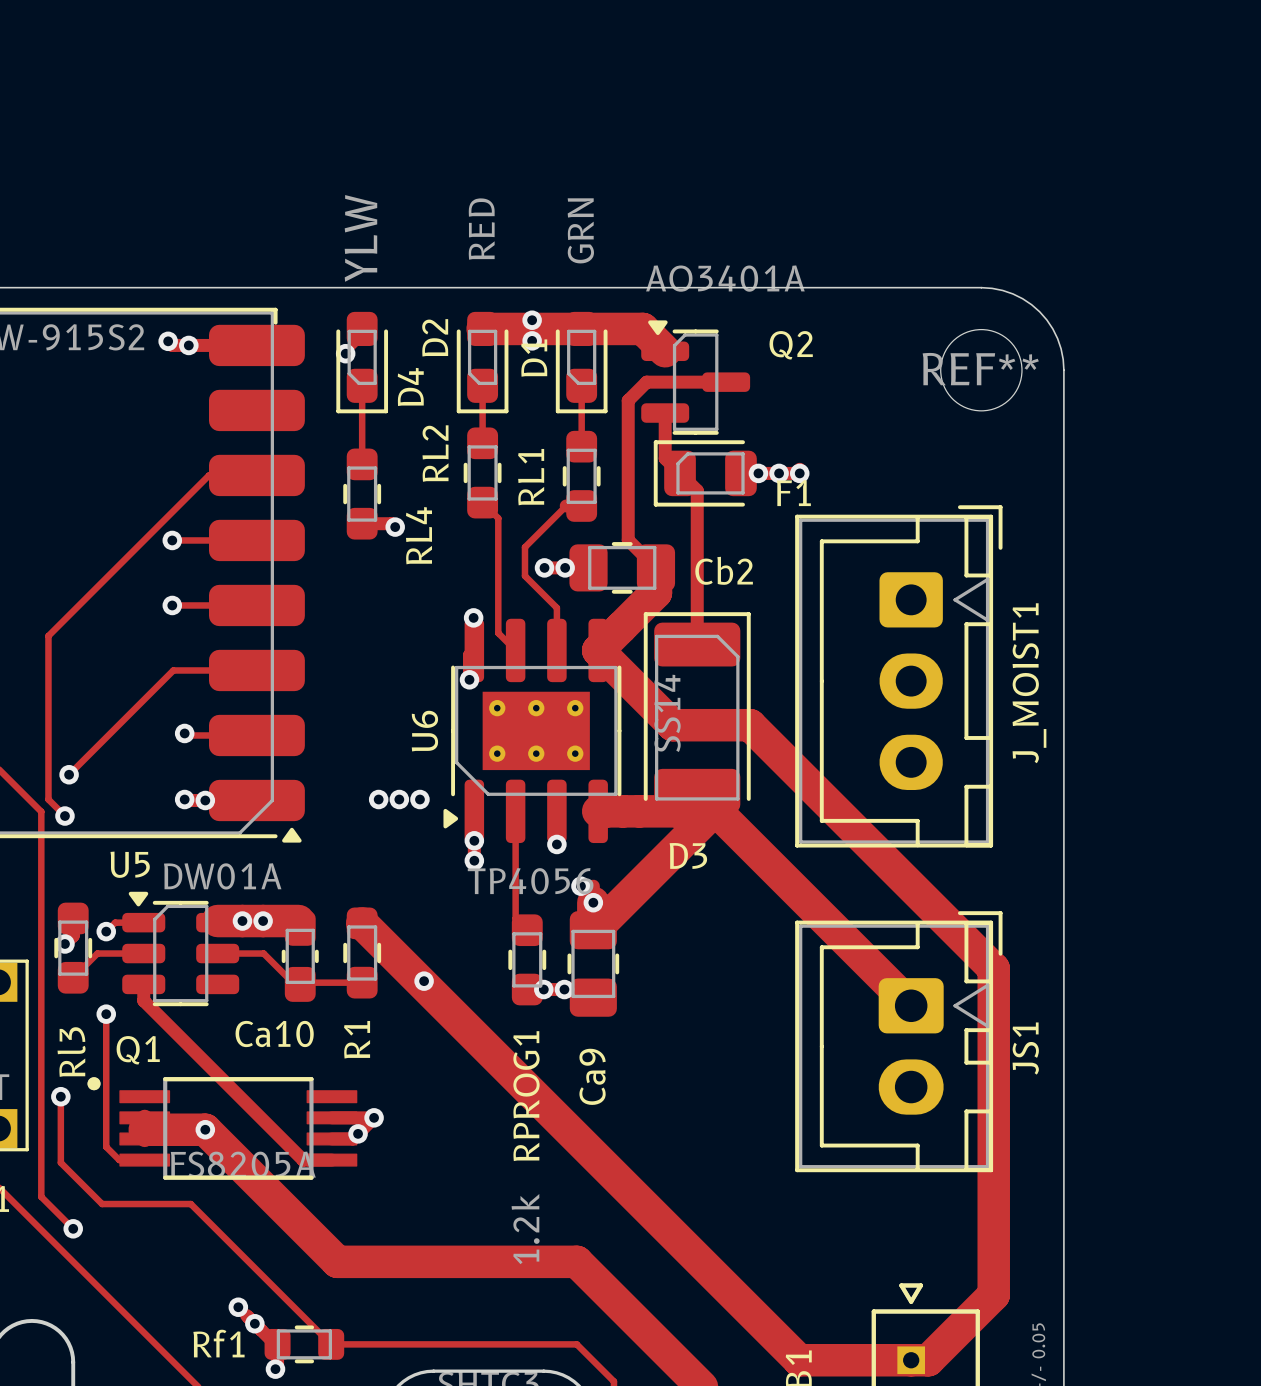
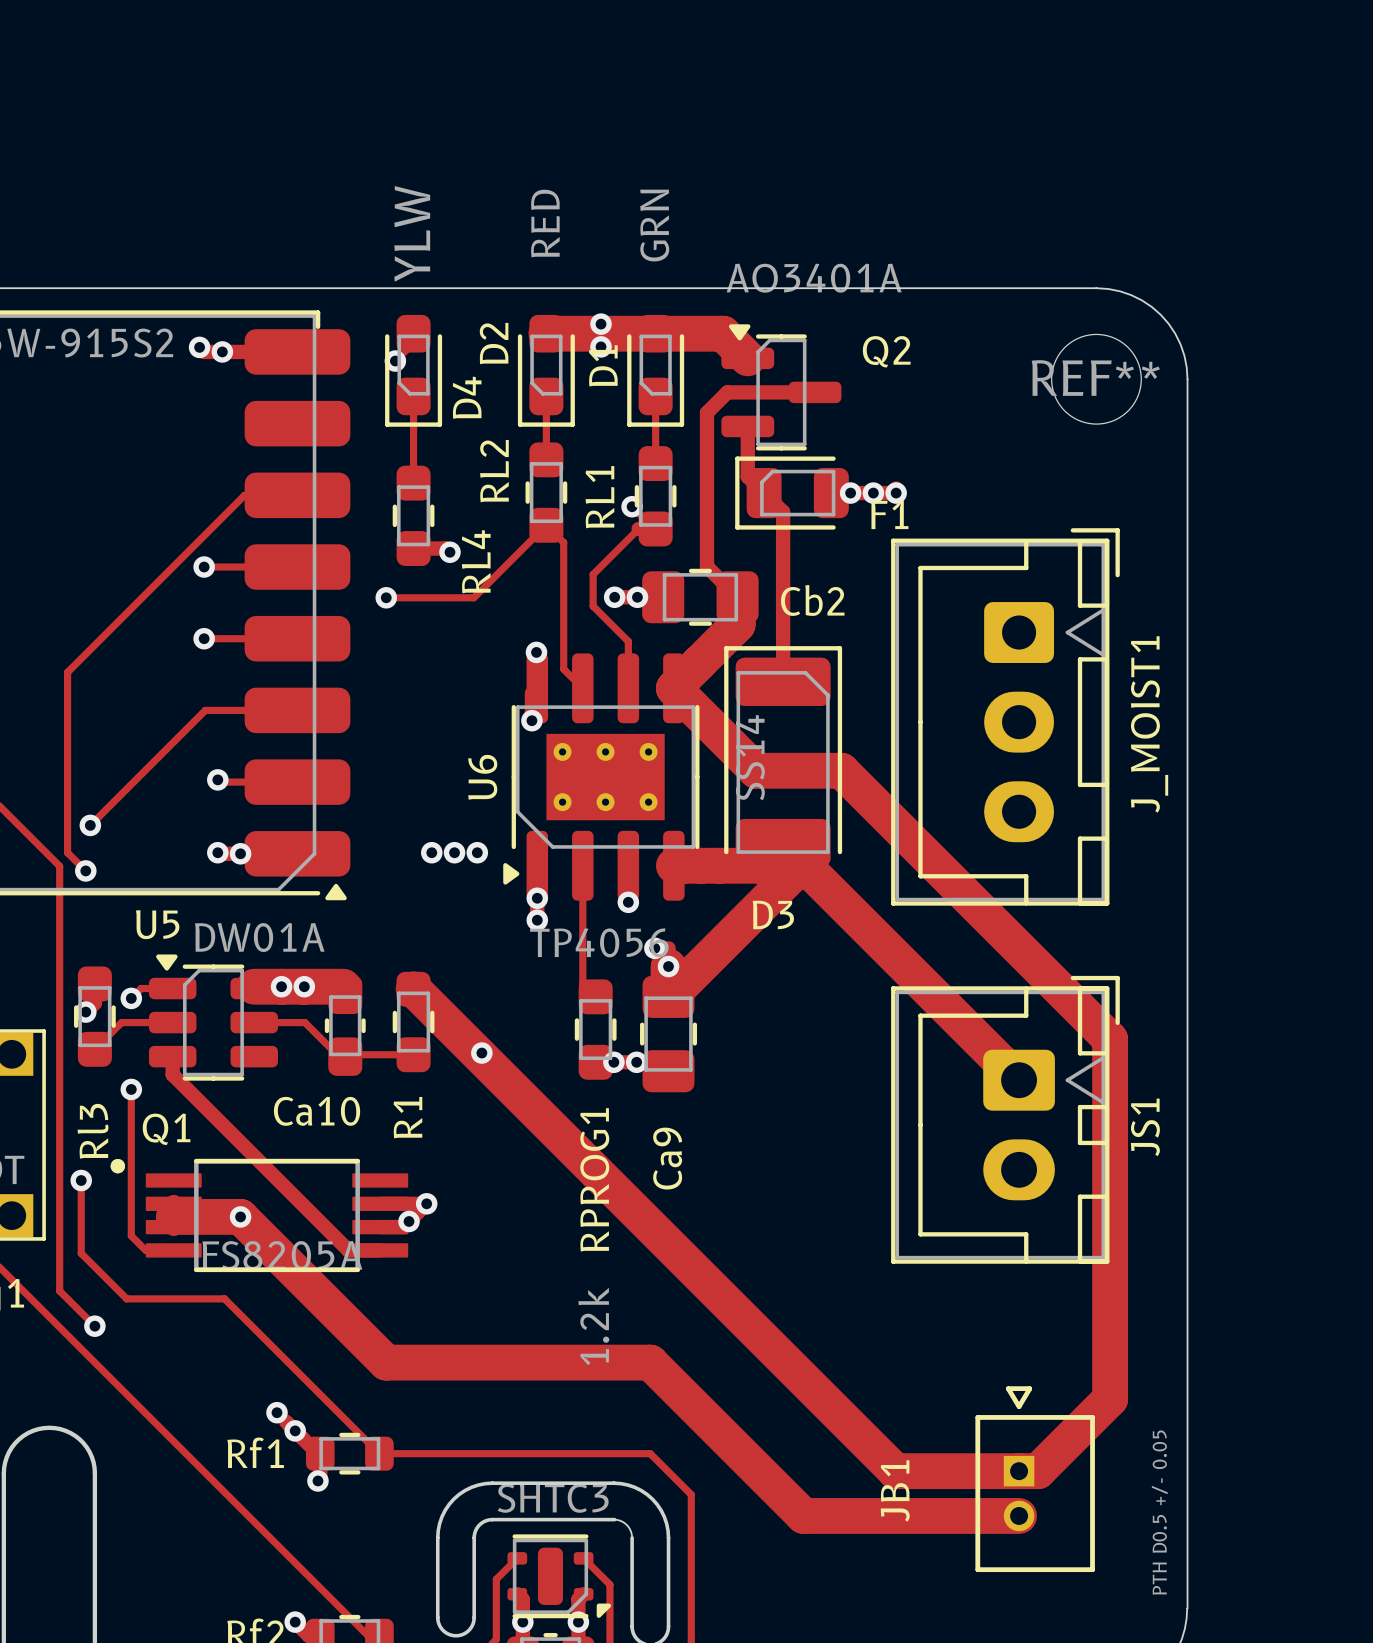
via: none -> (632, 506)
track: none -> (546, 525) (473, 597) (386, 597)
via: none -> (386, 597)

